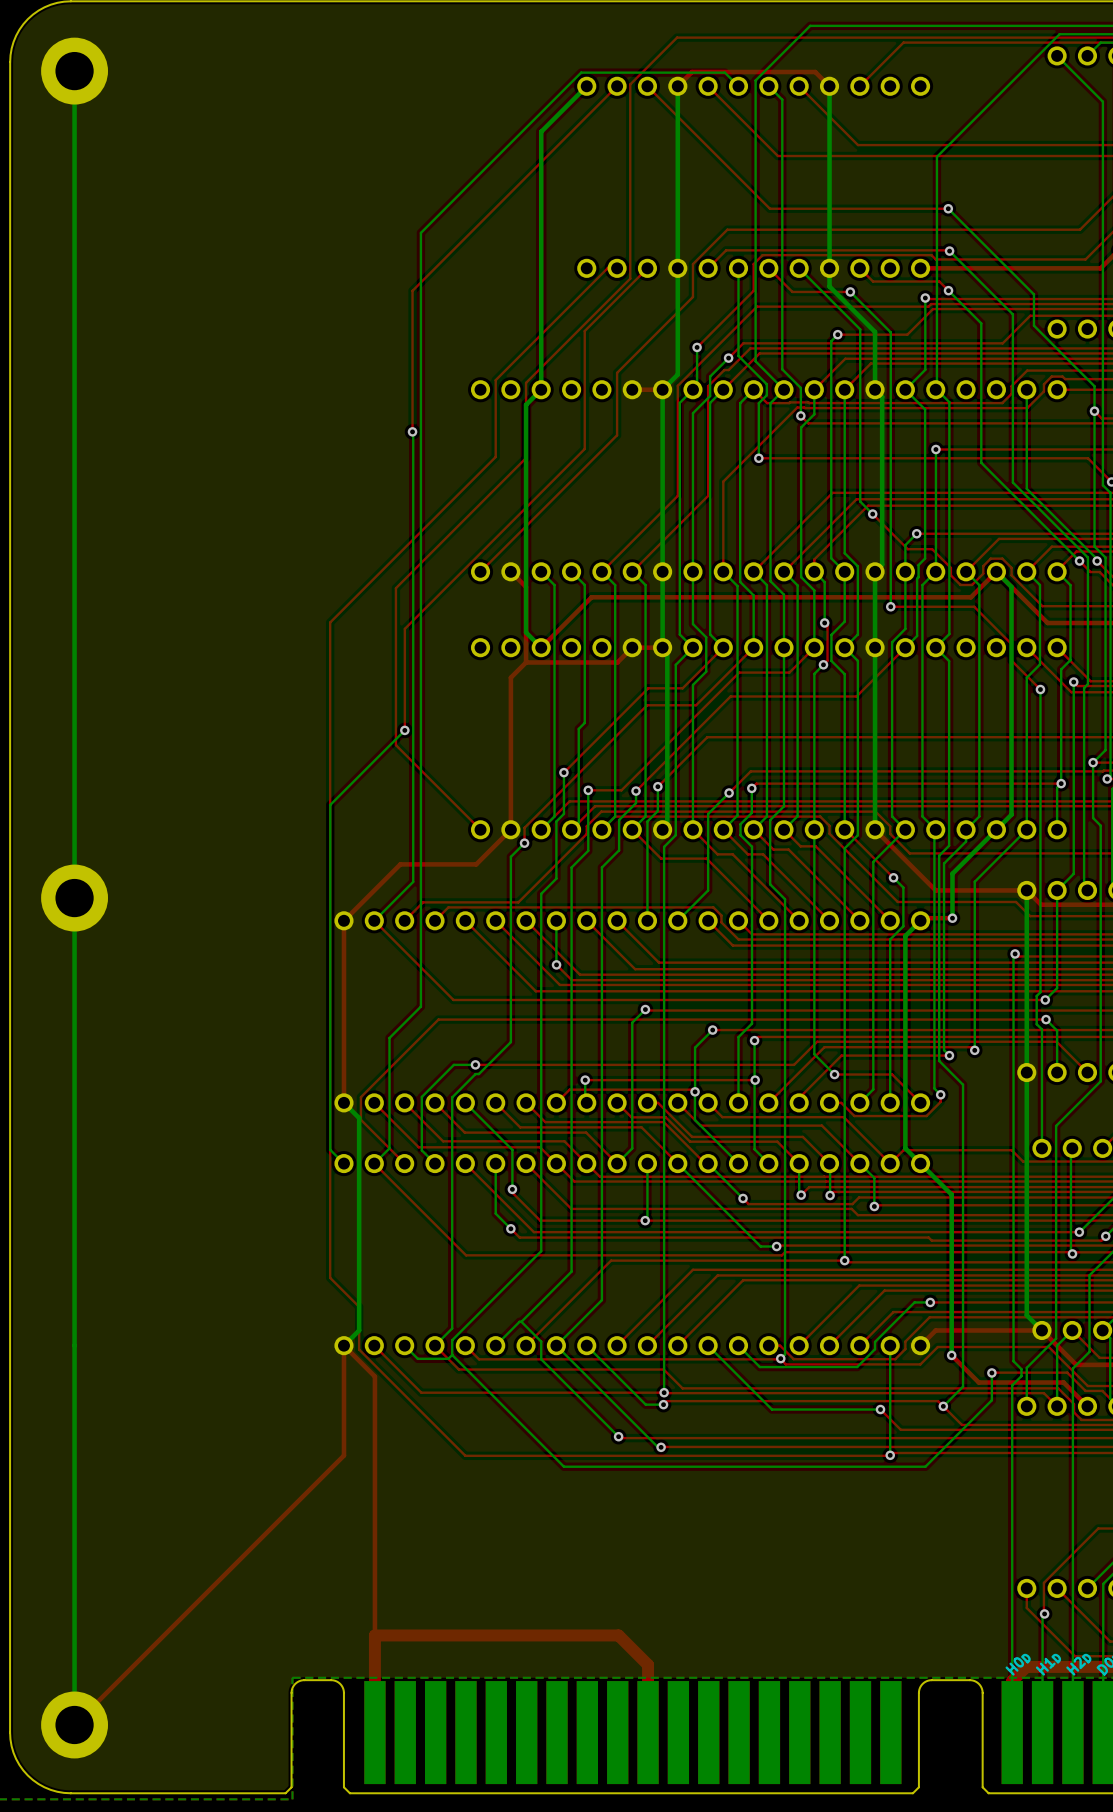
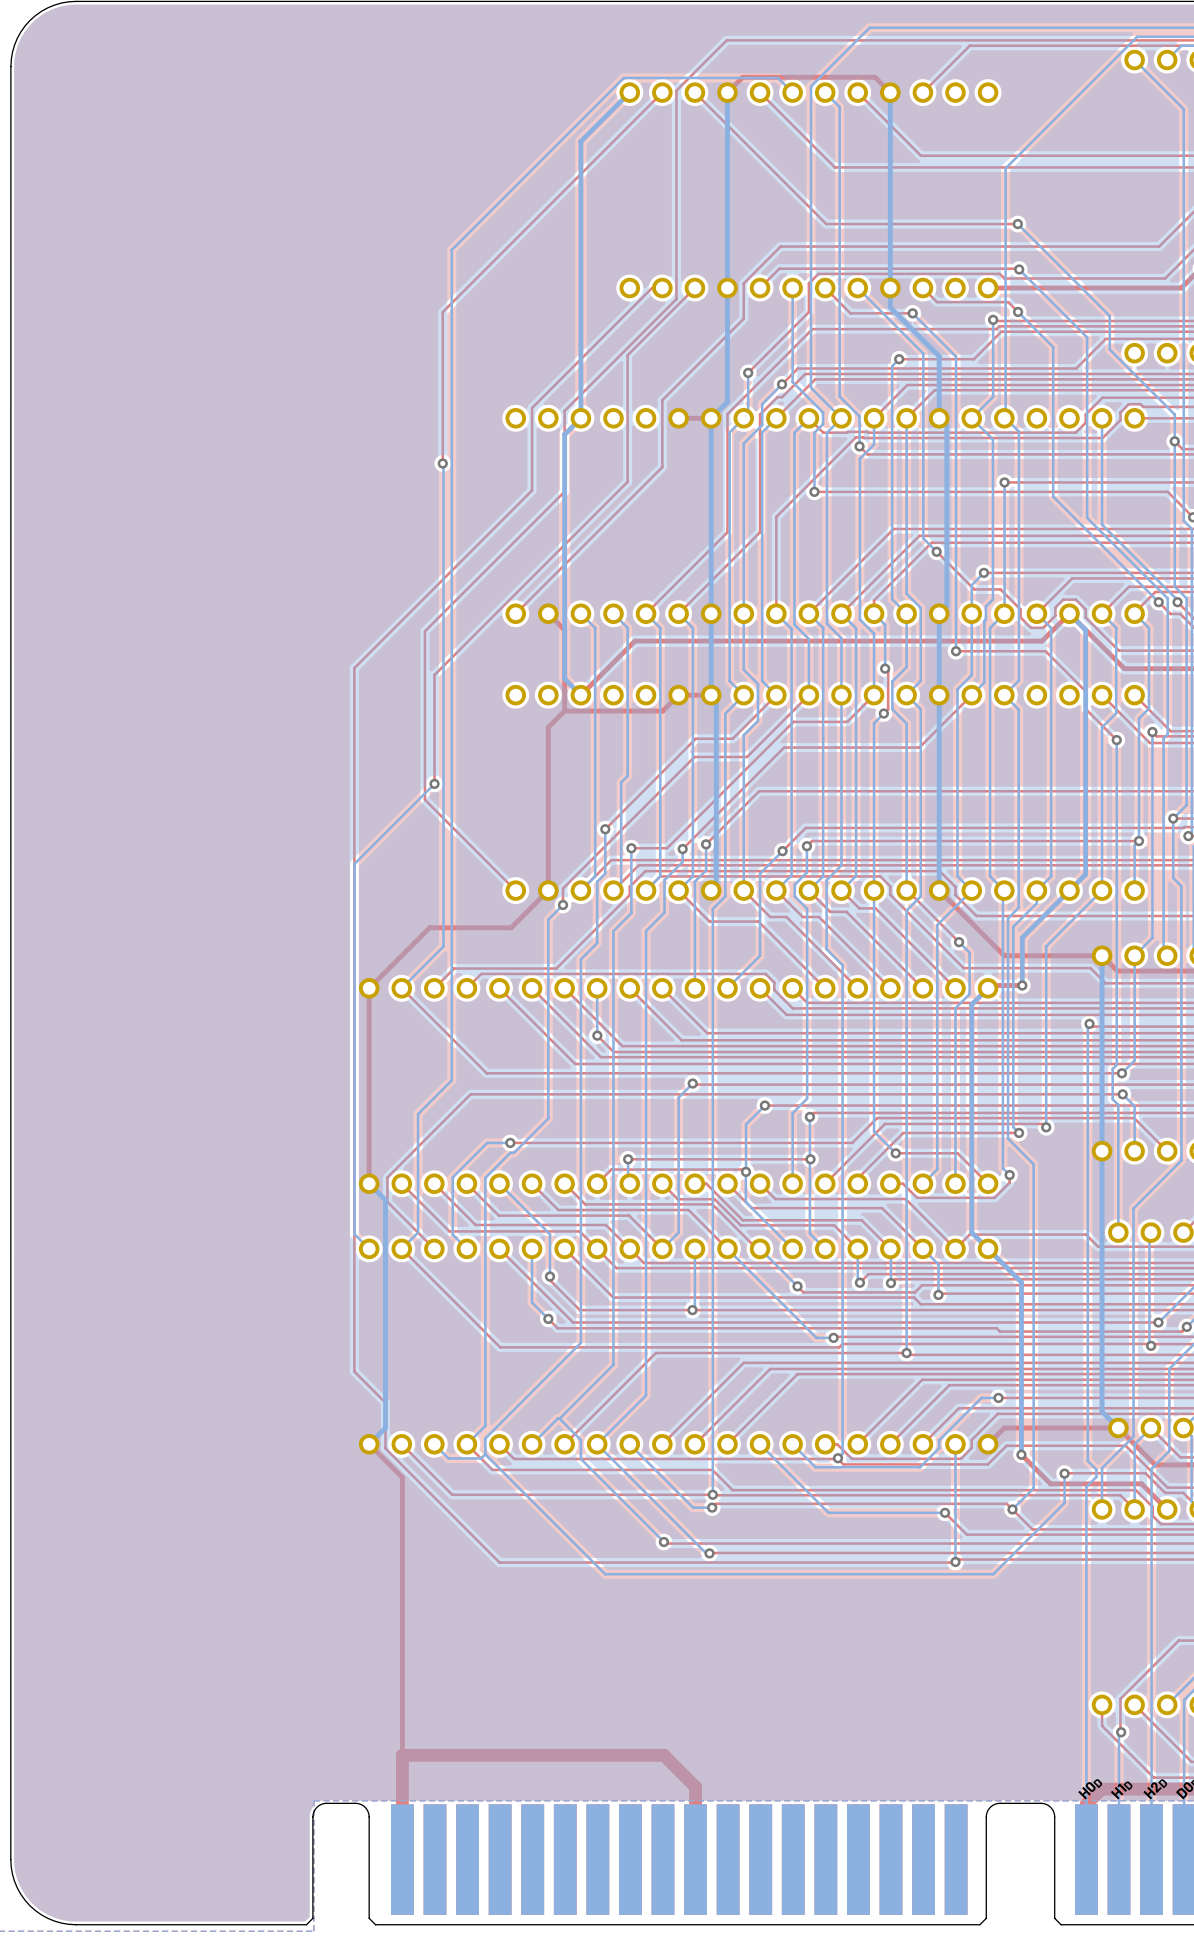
bottom track: (74, 71) (74, 1724) -> none
part: (74, 71) -> none
part: (74, 898) -> none
top track: (343, 1345) (343, 1455) (74, 1724) -> none
part: (74, 1724) -> none

